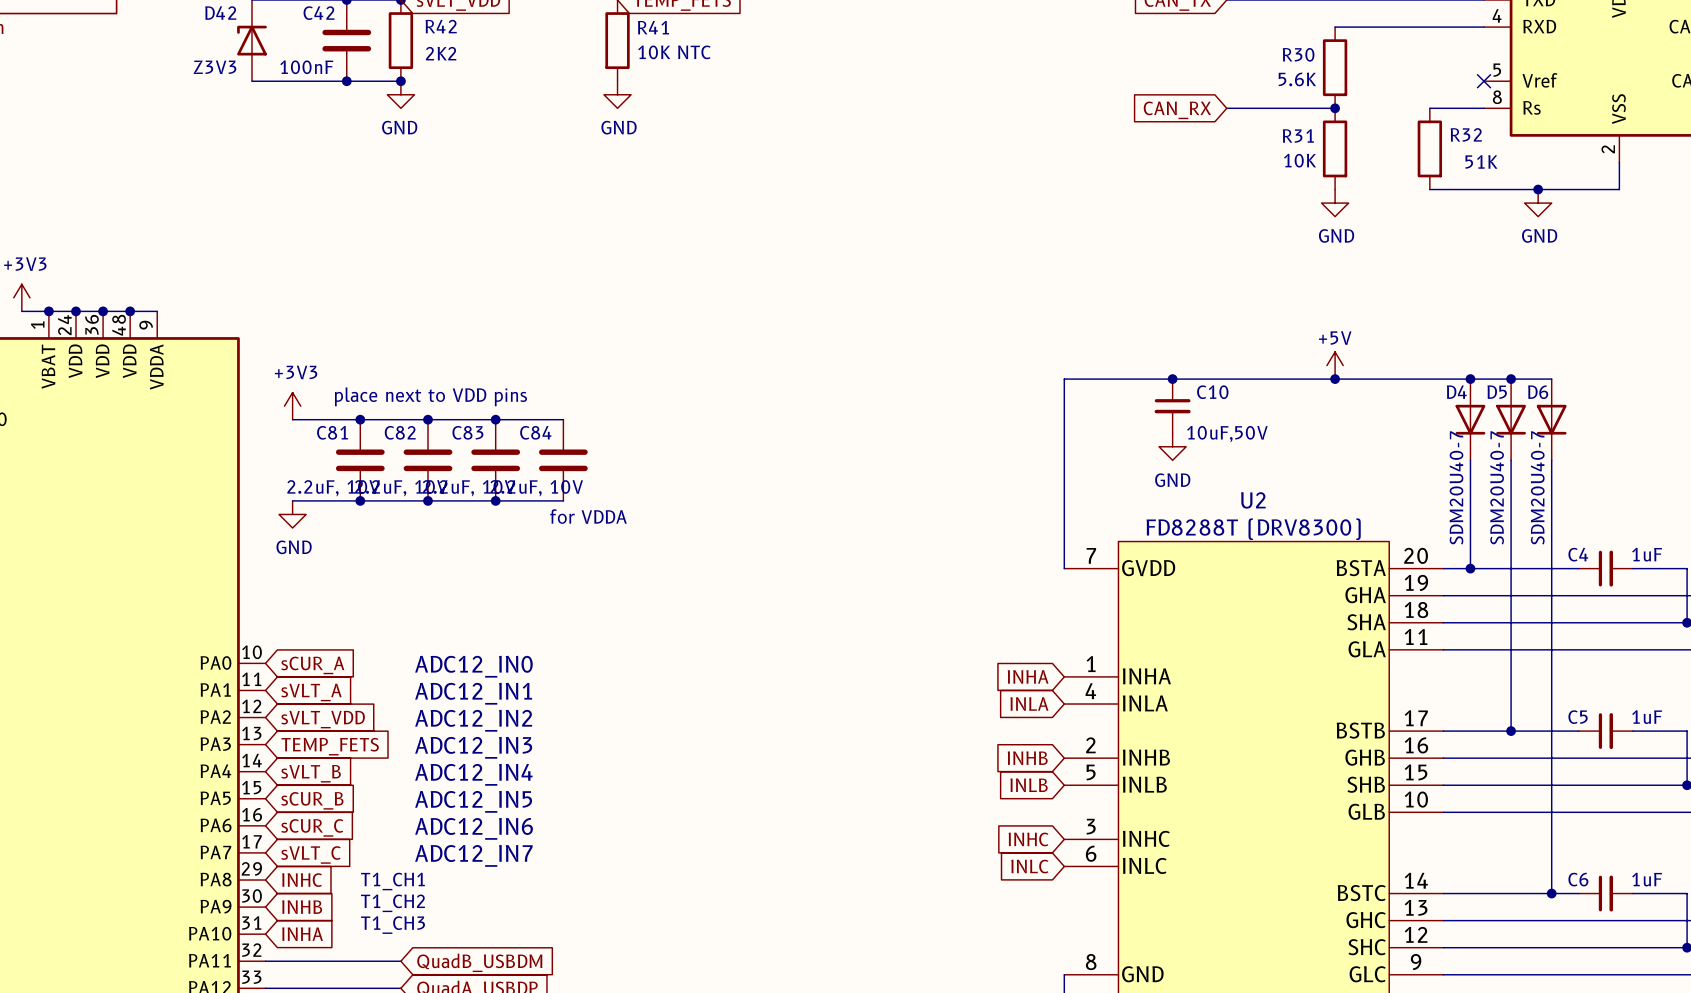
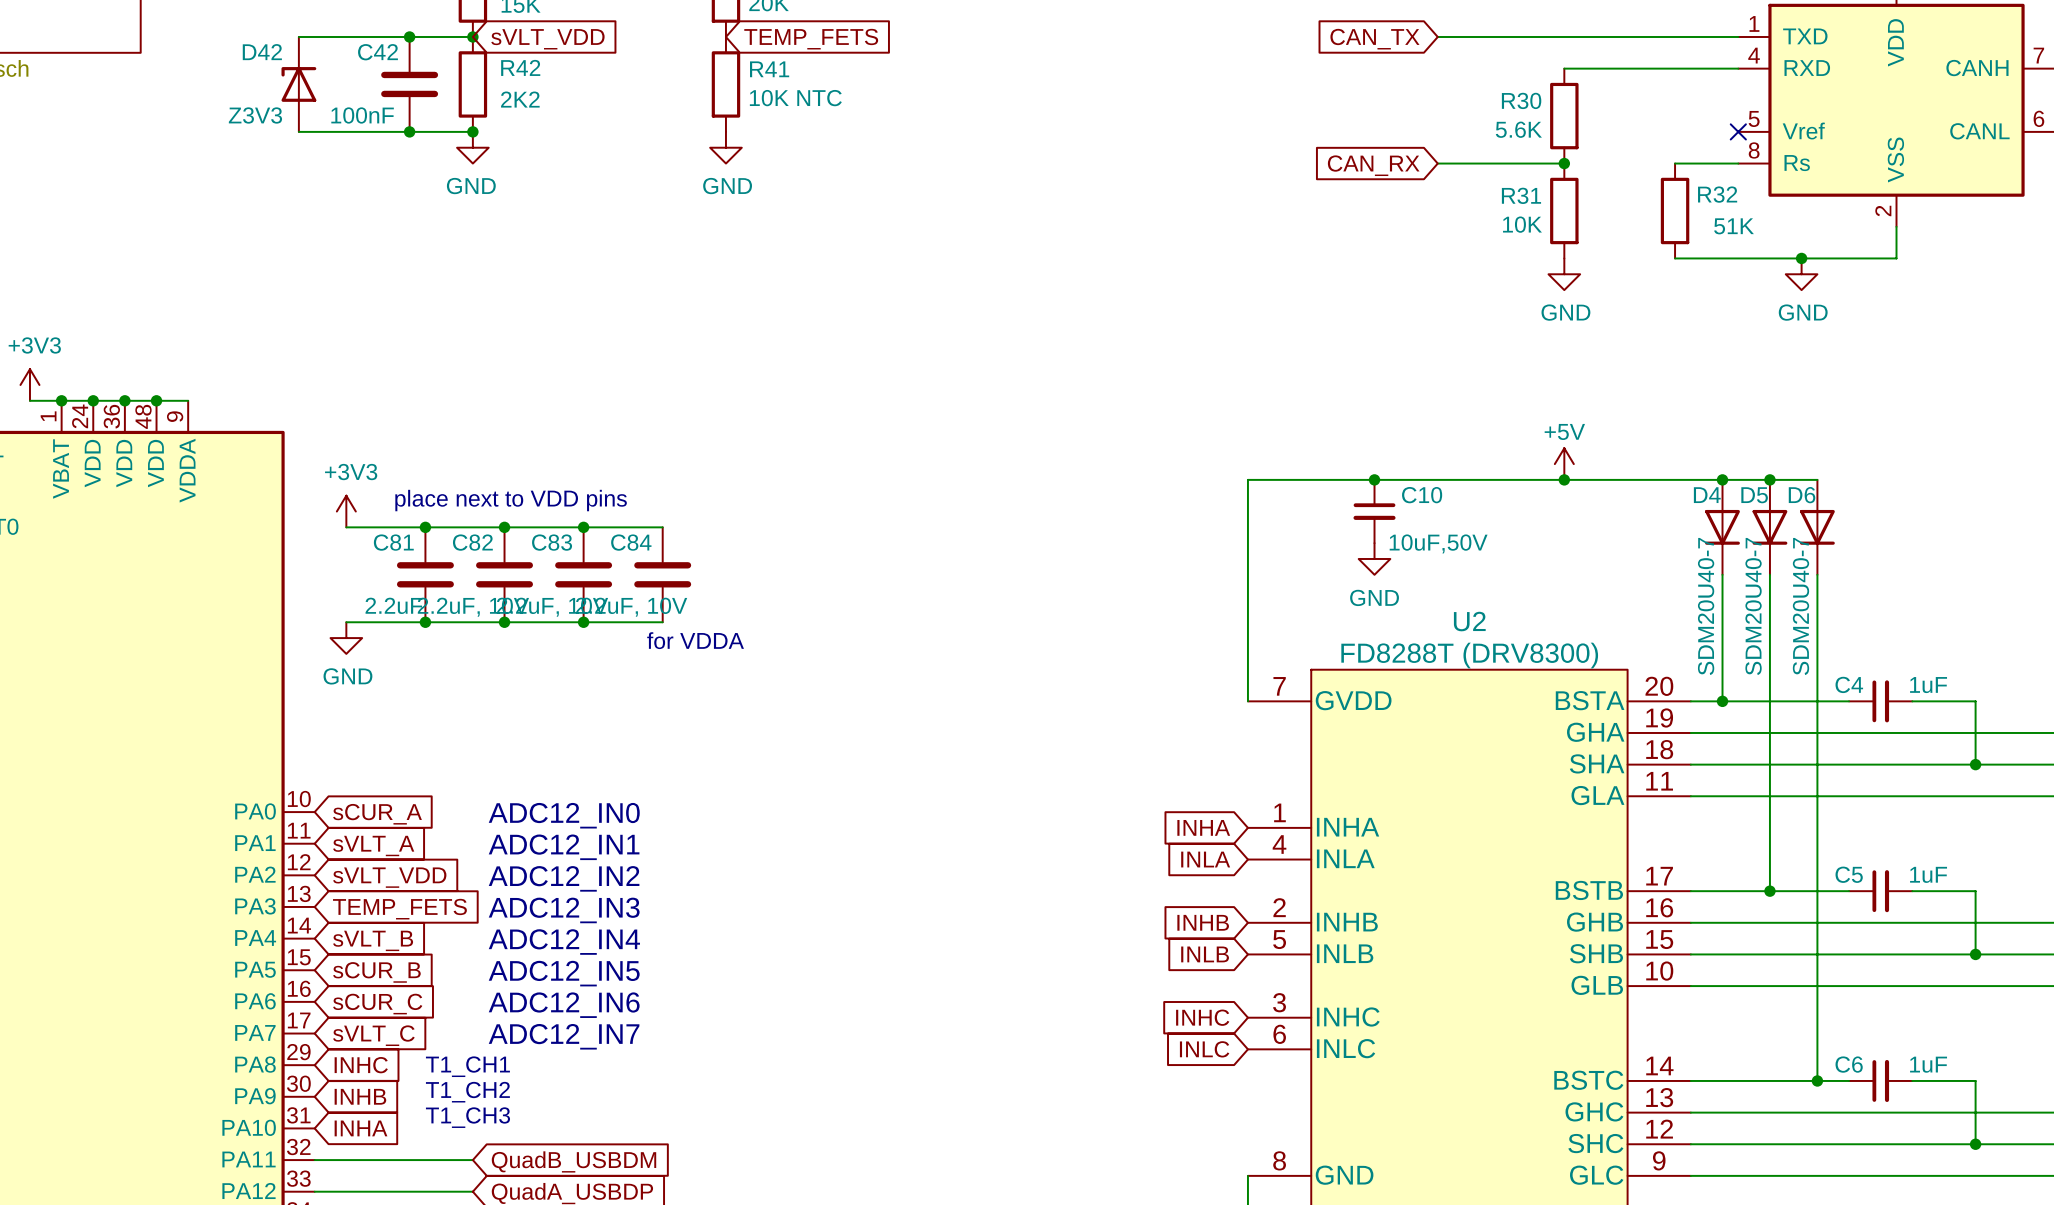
C81 value: 2.2uF, 10V (333, 488) -> 2.2uF (393, 605)

